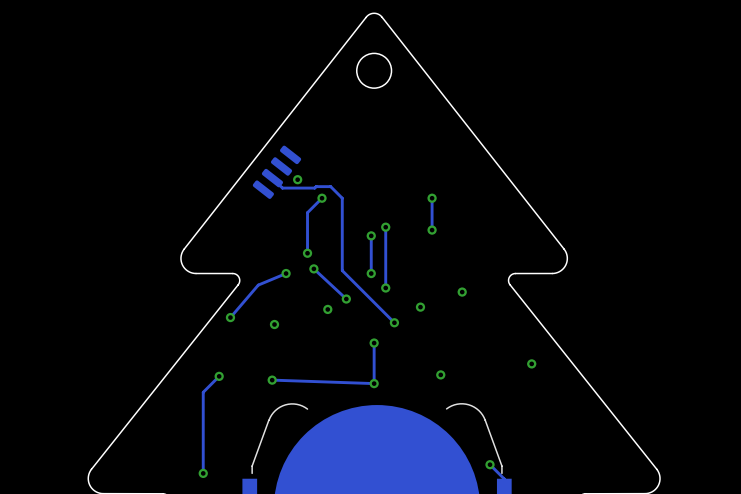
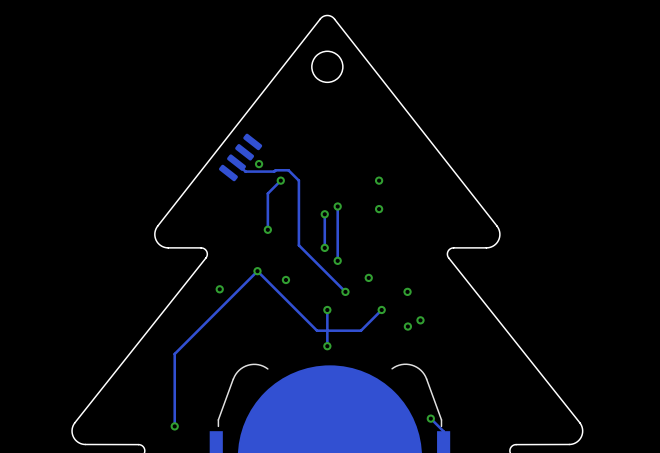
track: (432, 198) (432, 230) -> none
track: (313, 268) (346, 299) -> none
via: (313, 268) -> none
track: (286, 273) (258, 285) (230, 317) -> none
via: (286, 273) -> none
via: (462, 292) -> none
via: none -> (257, 271)
via: (346, 299) -> none
via: (230, 317) -> none
via: none -> (219, 289)
via: none -> (407, 291)
via: (274, 324) -> none
track: none -> (381, 309) (360, 330) (317, 330) (257, 271) (188, 339)
via: none -> (381, 309)
via: none -> (420, 320)
via: none -> (407, 326)
via: (531, 363) -> none
via: (440, 374) -> none
via: (219, 376) -> none
track: (272, 380) (374, 383) -> none
via: (272, 380) -> none

